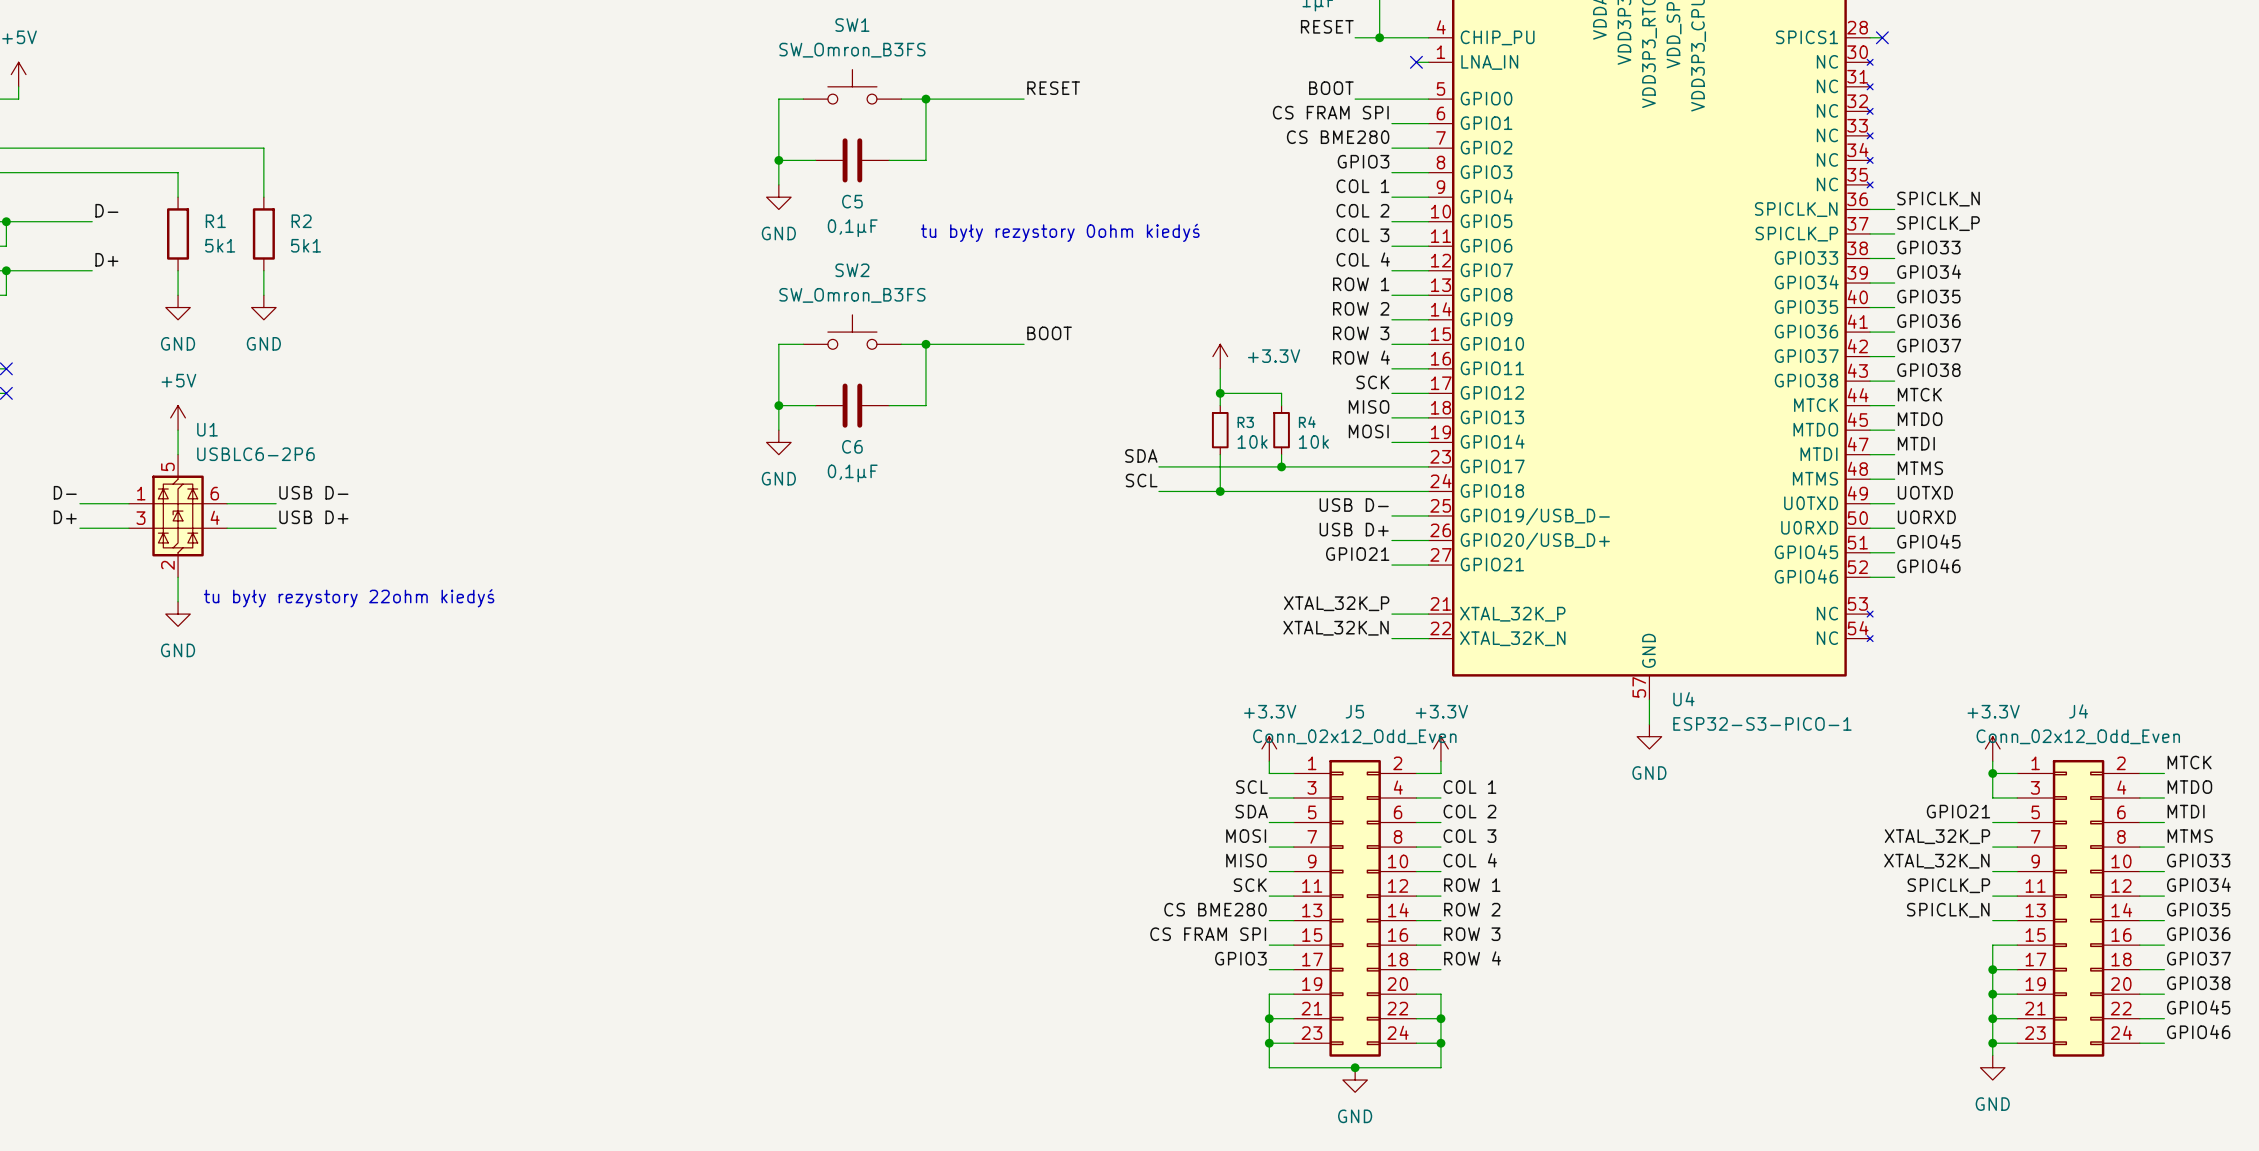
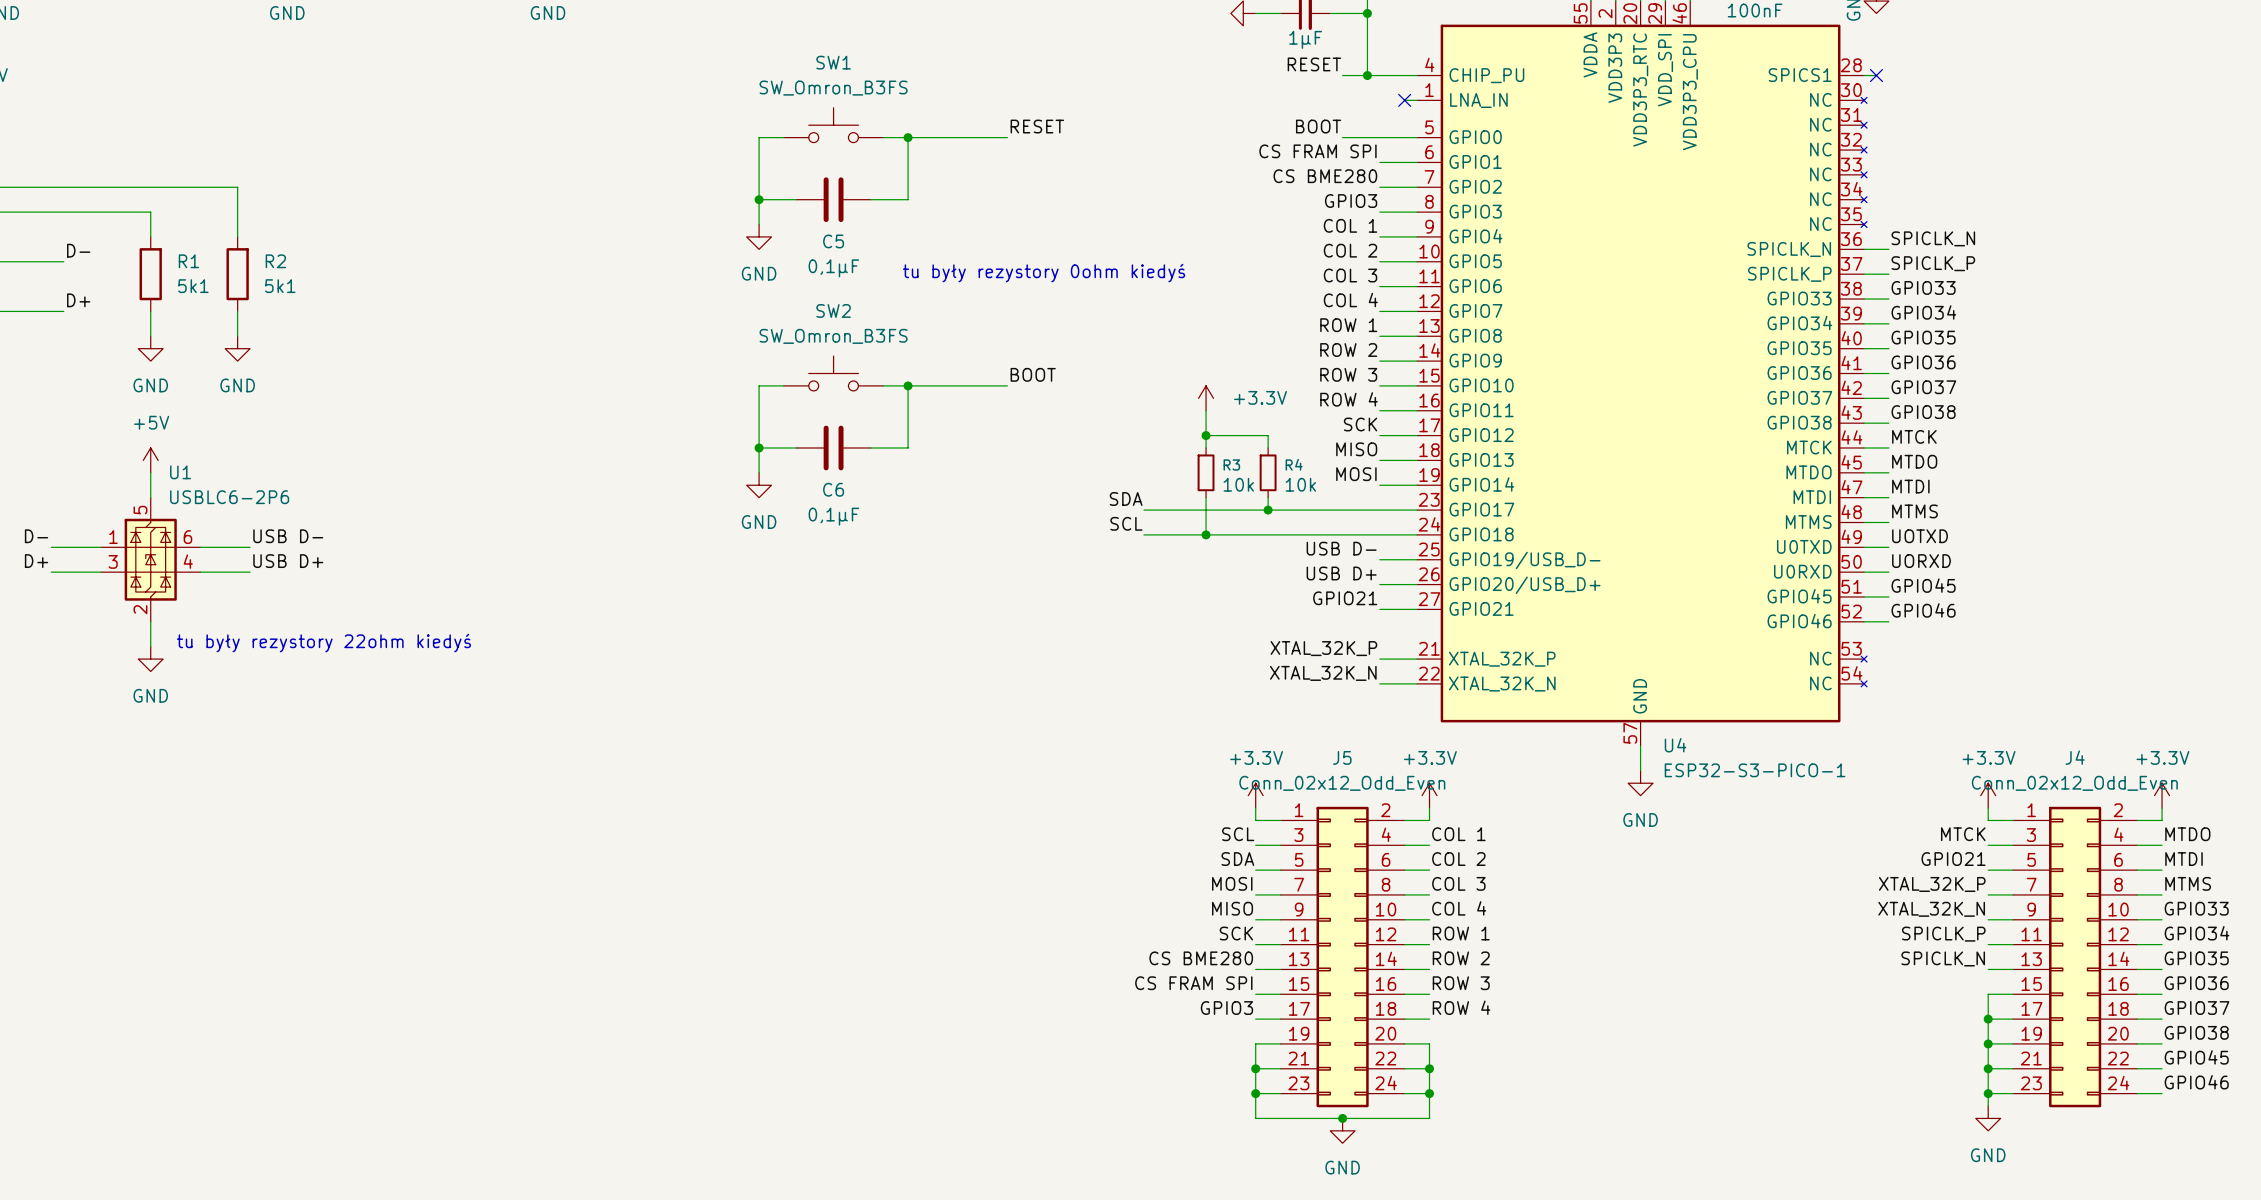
power symbol: none -> +3.3V (2162, 795)
wire: none -> (2162, 808) (2162, 820)
label position: MTCK (2189, 762) -> MTCK (1963, 834)
wire: (1992, 773) (1992, 797) -> none
junction: (1992, 773) -> none

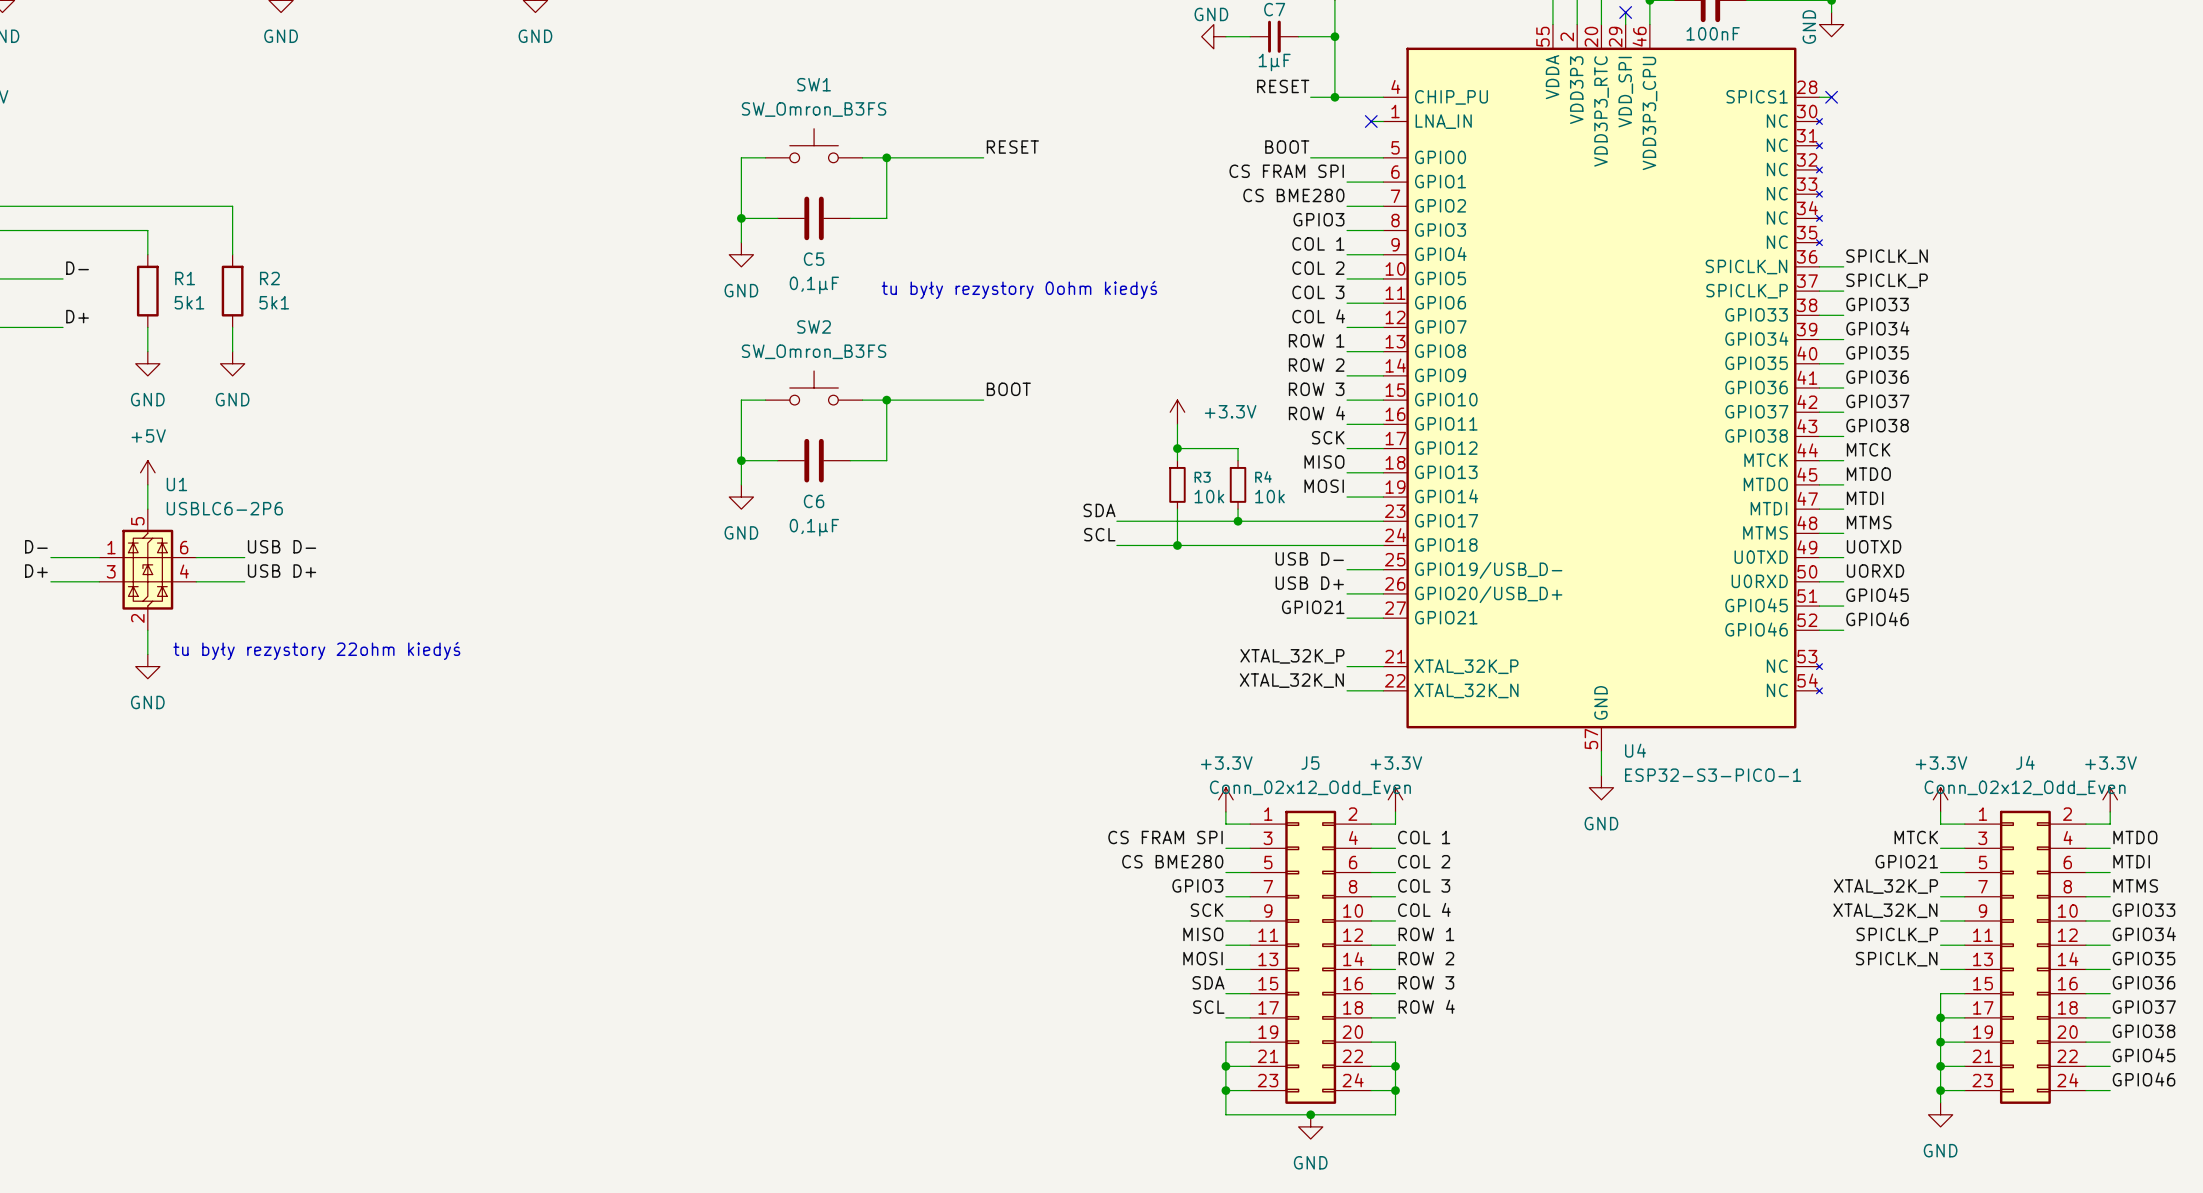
label: SCL (1238, 834) -> CS FRAM SPI (1165, 837)
label: SDA (1237, 859) -> CS BME280 (1172, 861)
label: MOSI (1232, 883) -> GPIO3 (1197, 885)
label: MISO (1232, 908) -> SCK (1207, 910)
label: SCK (1236, 933) -> MISO (1203, 934)
label: CS BME280 (1201, 958) -> MOSI (1203, 958)
label: CS FRAM SPI (1193, 983) -> SDA (1208, 982)
label: GPIO3 (1226, 1008) -> SCL (1208, 1007)

